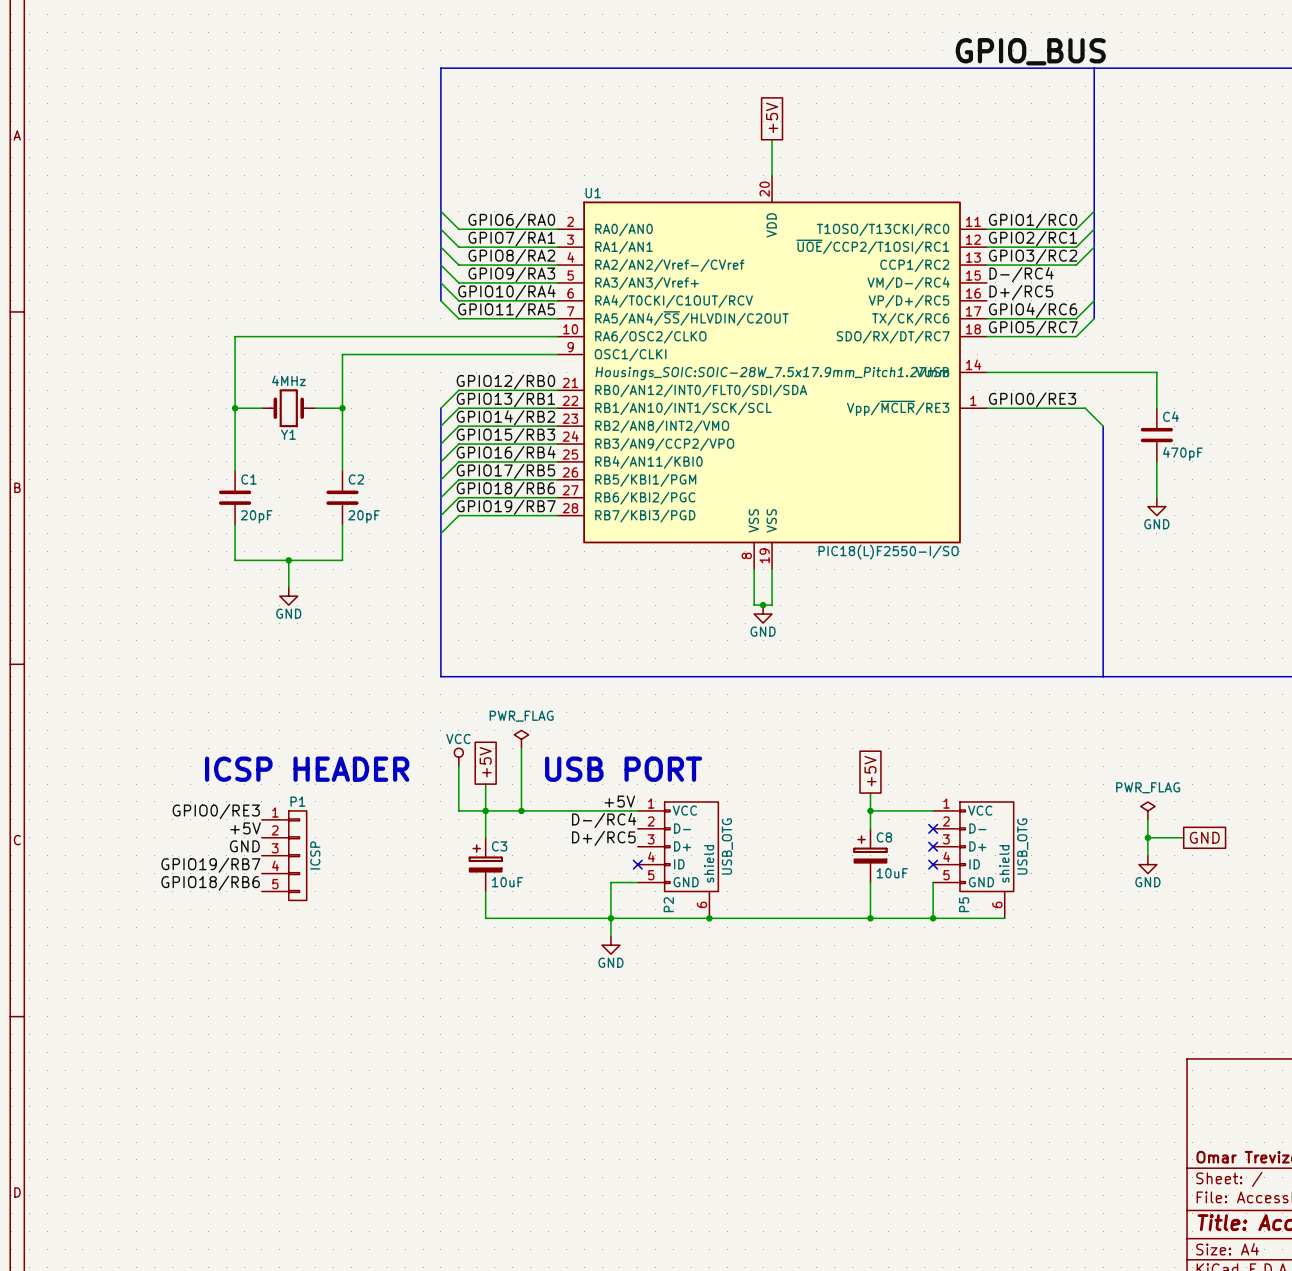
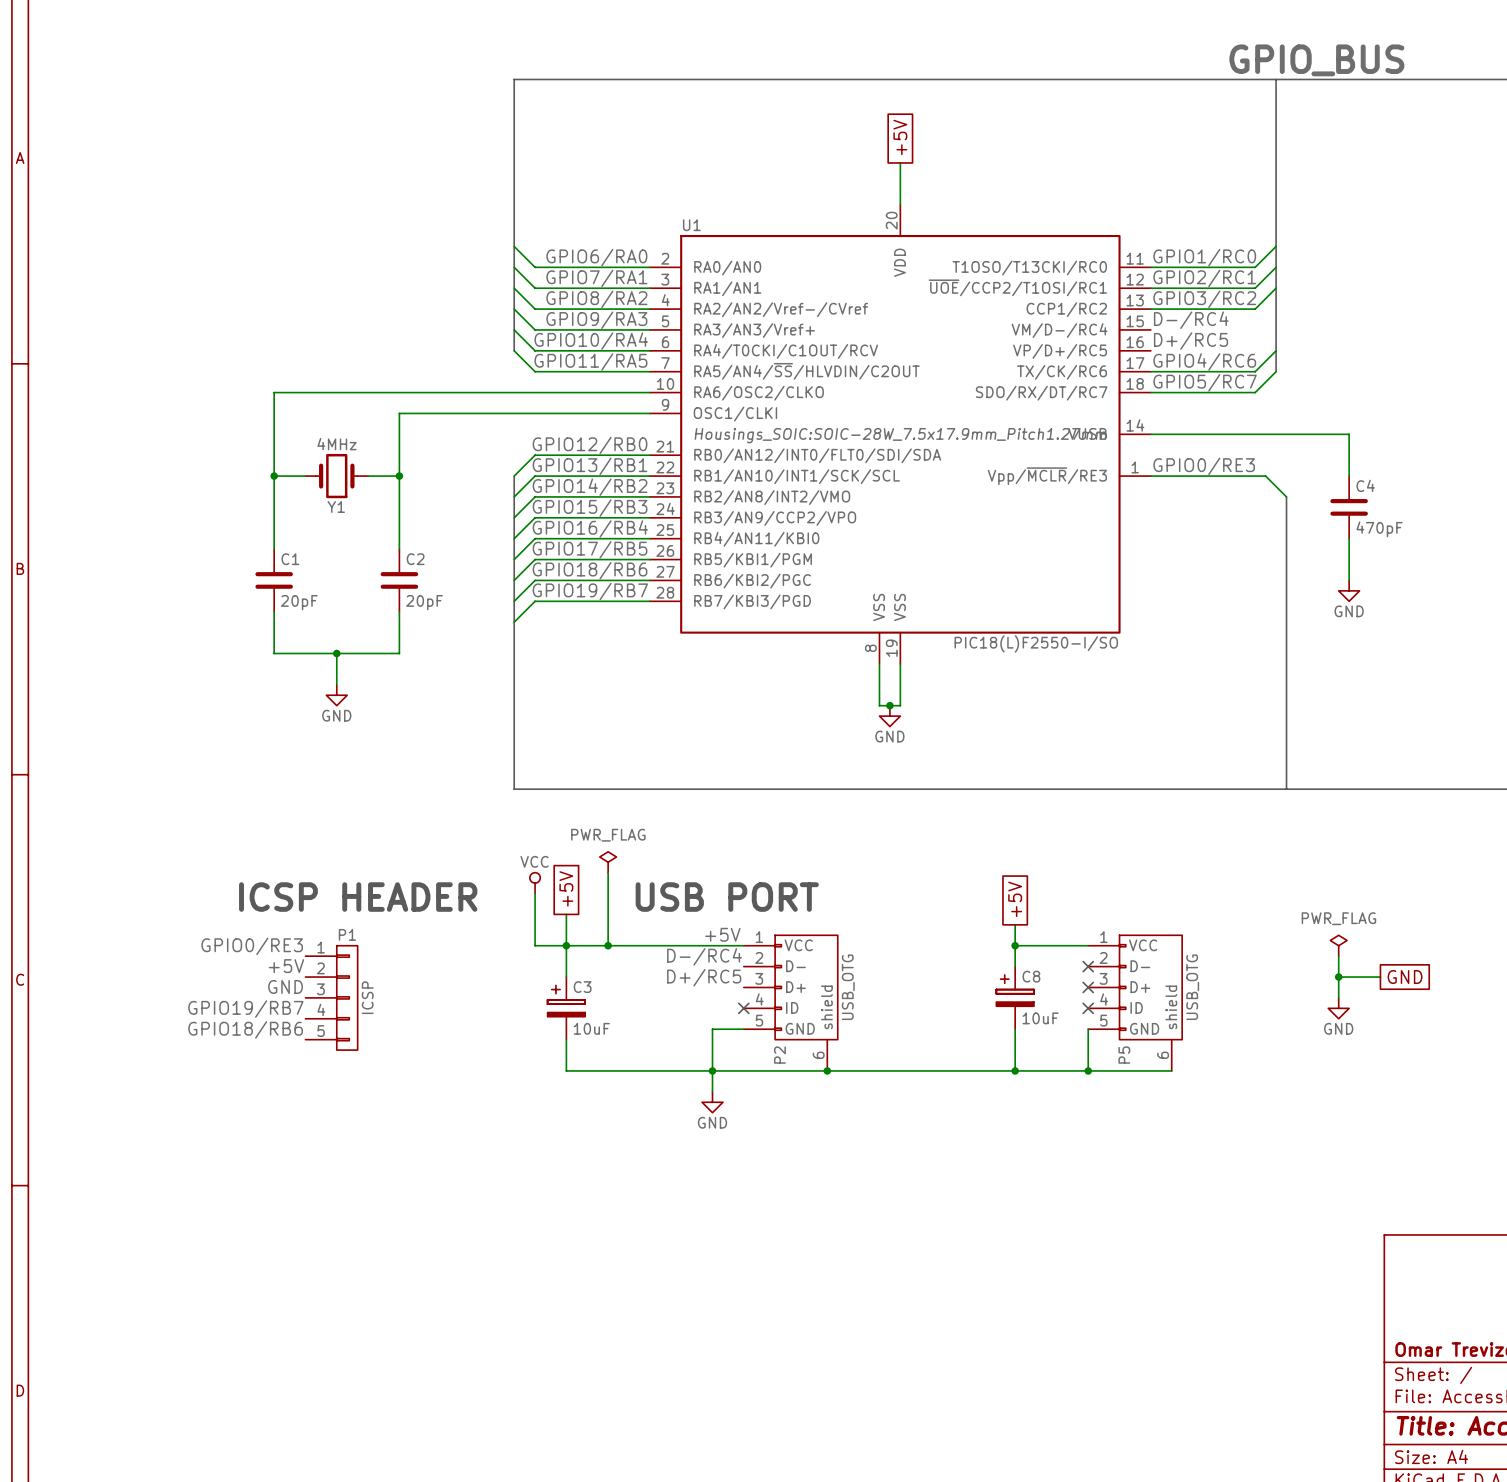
label position: GPIO_BUS (1030, 51) -> GPIO_BUS (1316, 60)

